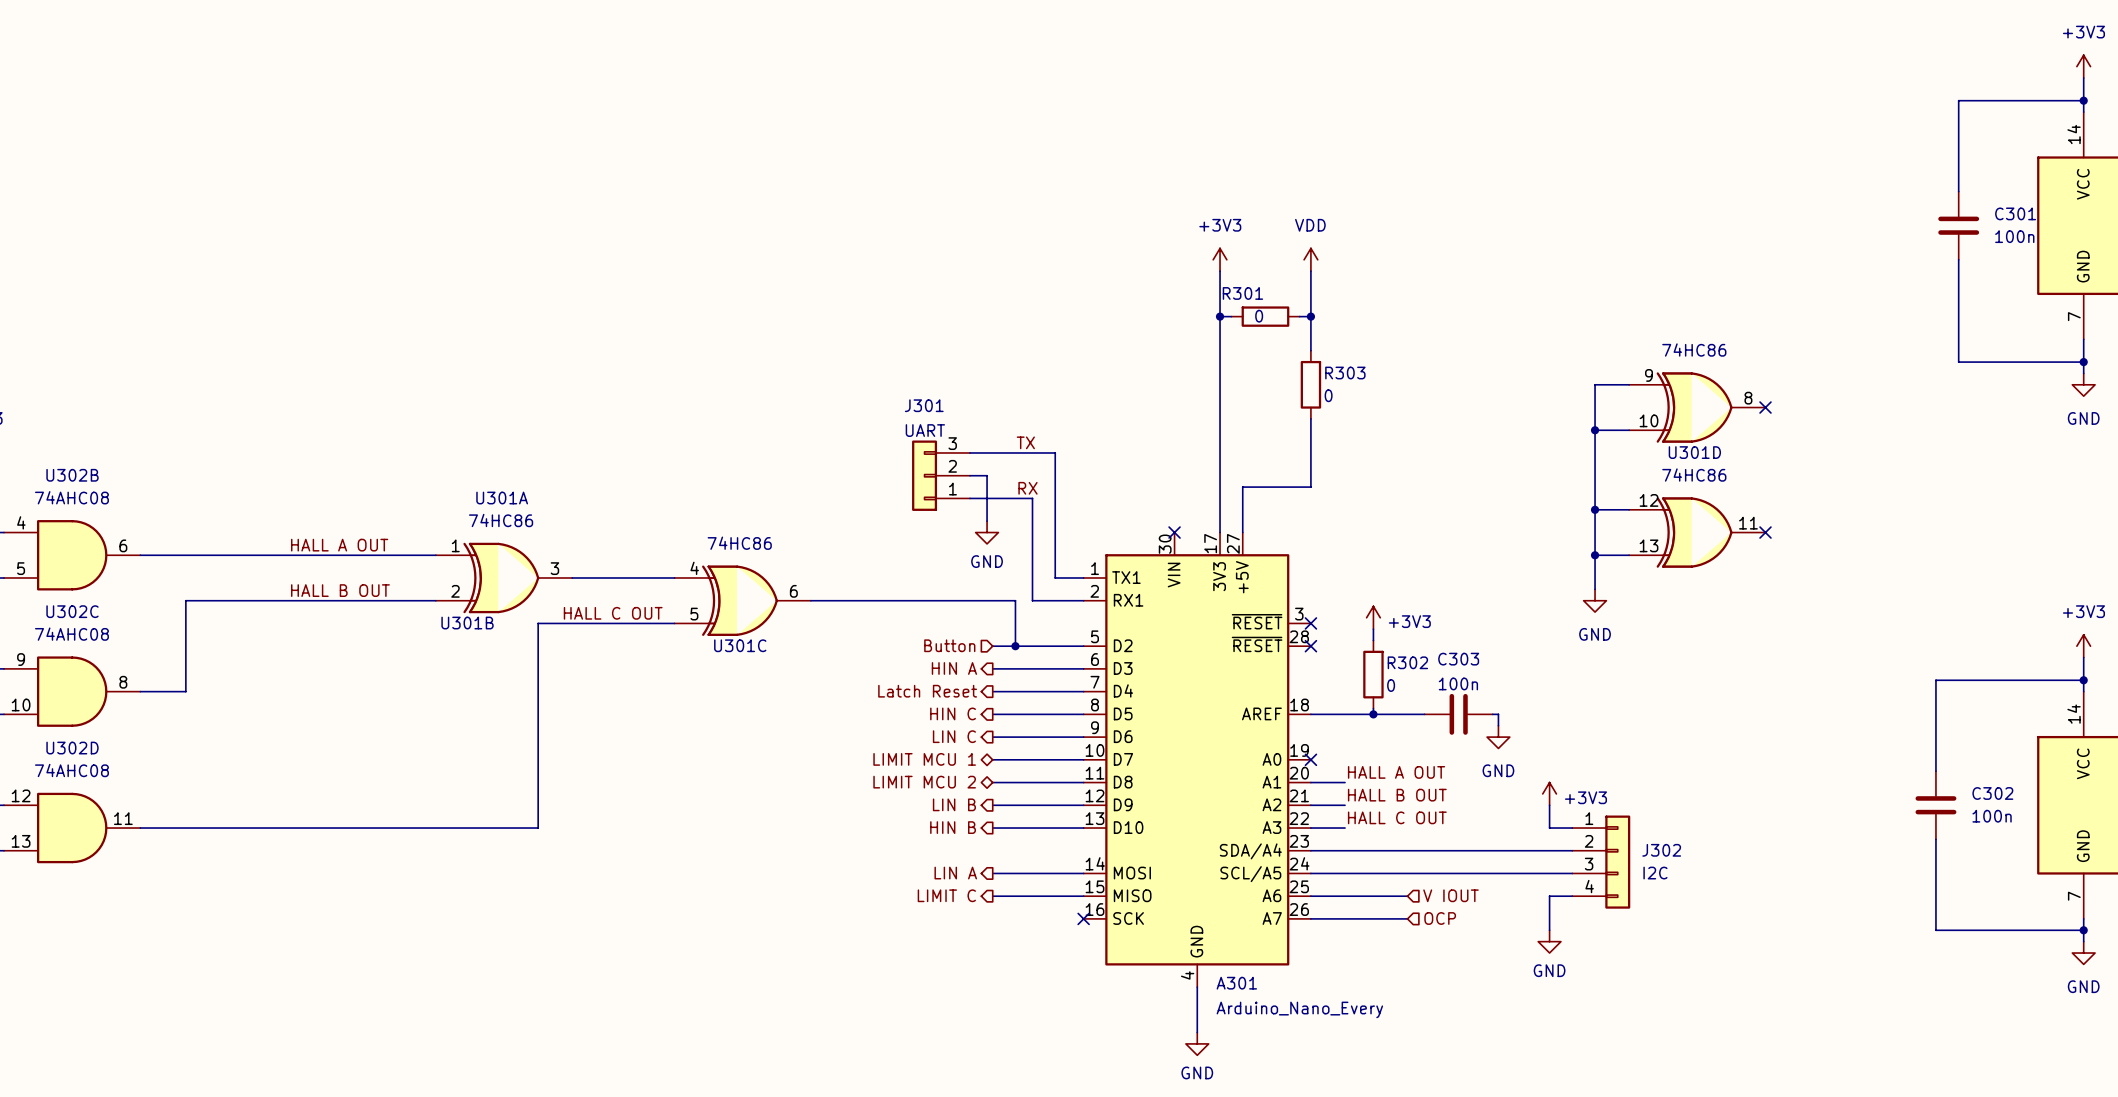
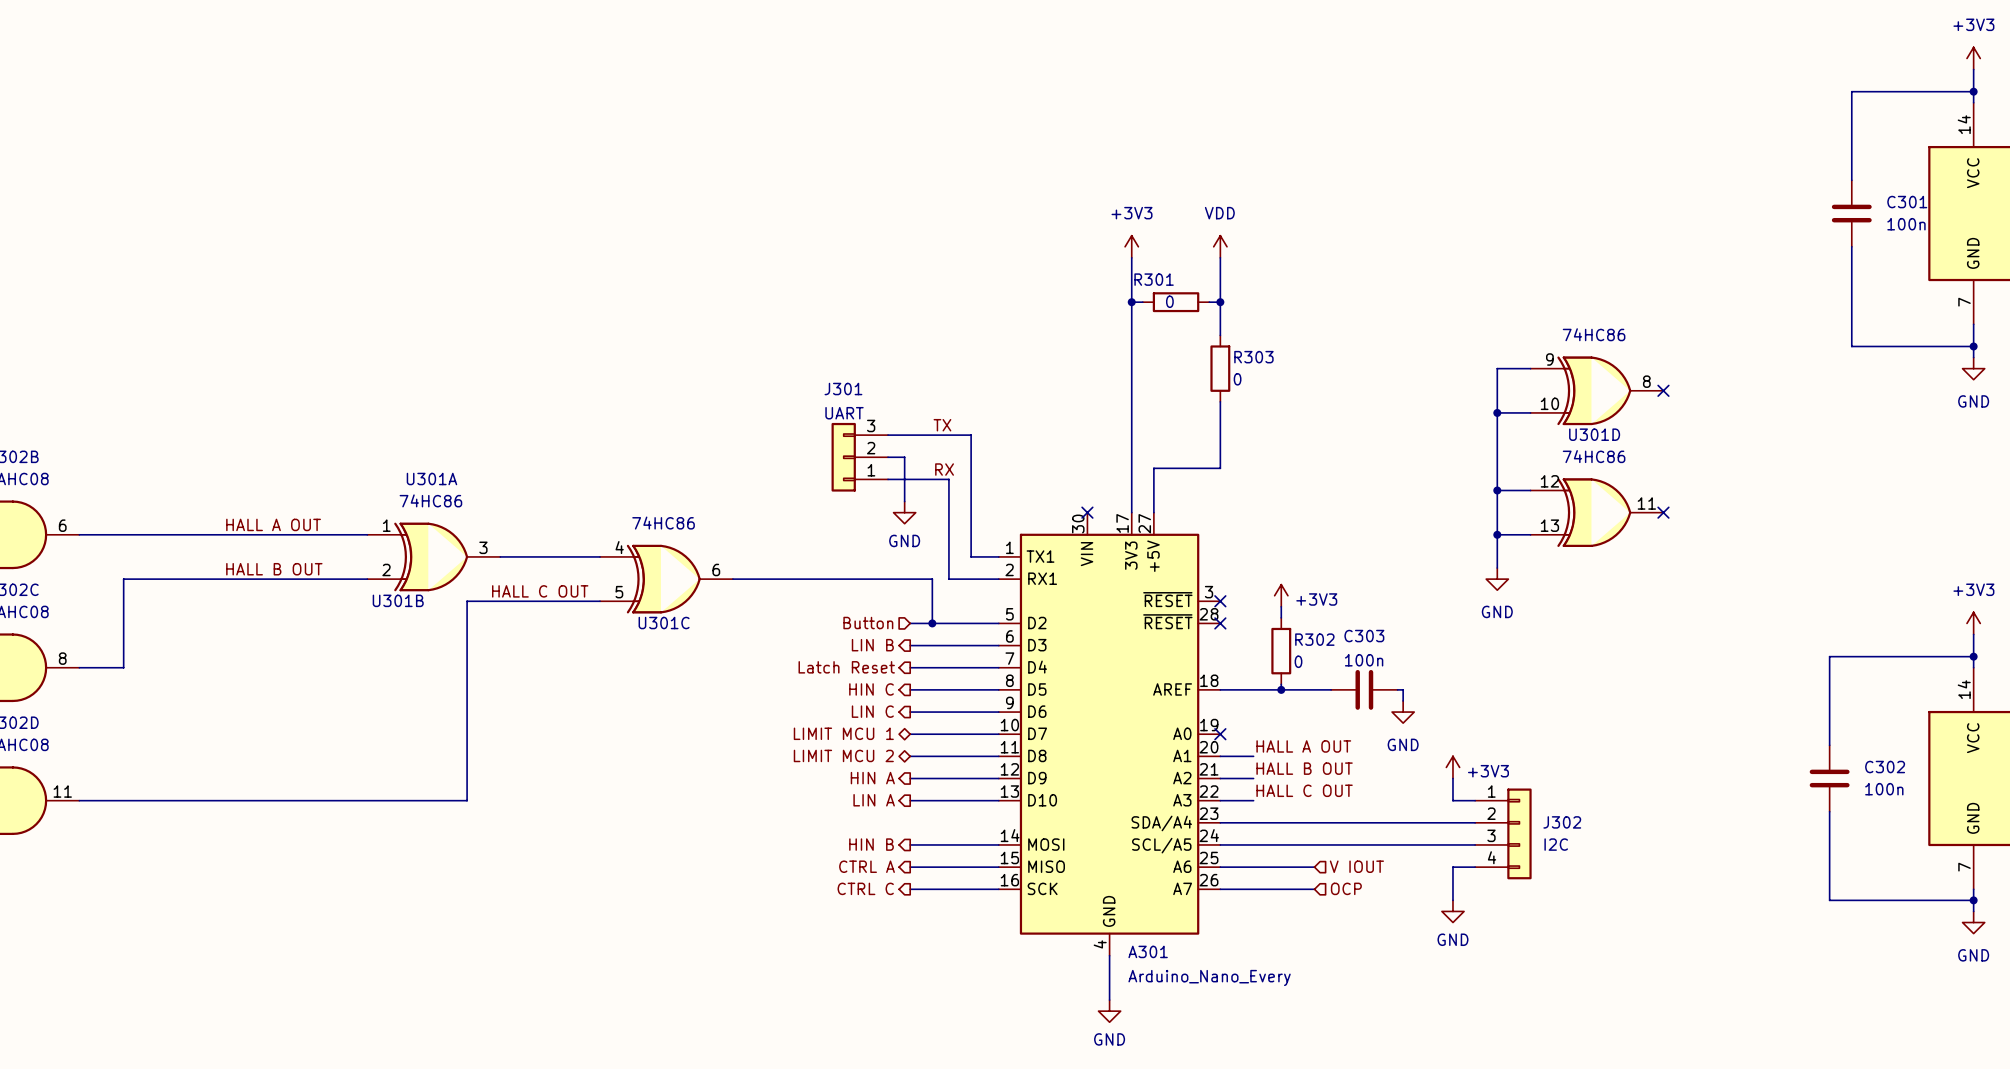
hierarchical label: HIN A (954, 668) -> LIN B (872, 645)
hierarchical label: LIN B (954, 804) -> HIN A (872, 778)
hierarchical label: HIN B (953, 827) -> LIN A (874, 800)
hierarchical label: LIN A (955, 873) -> HIN B (871, 844)
hierarchical label: LIMIT C (946, 895) -> CTRL A (867, 866)
hierarchical label: none -> CTRL C (865, 888)
wire: none -> (910, 889) (998, 889)
no-connect mark: (1083, 918) -> none

